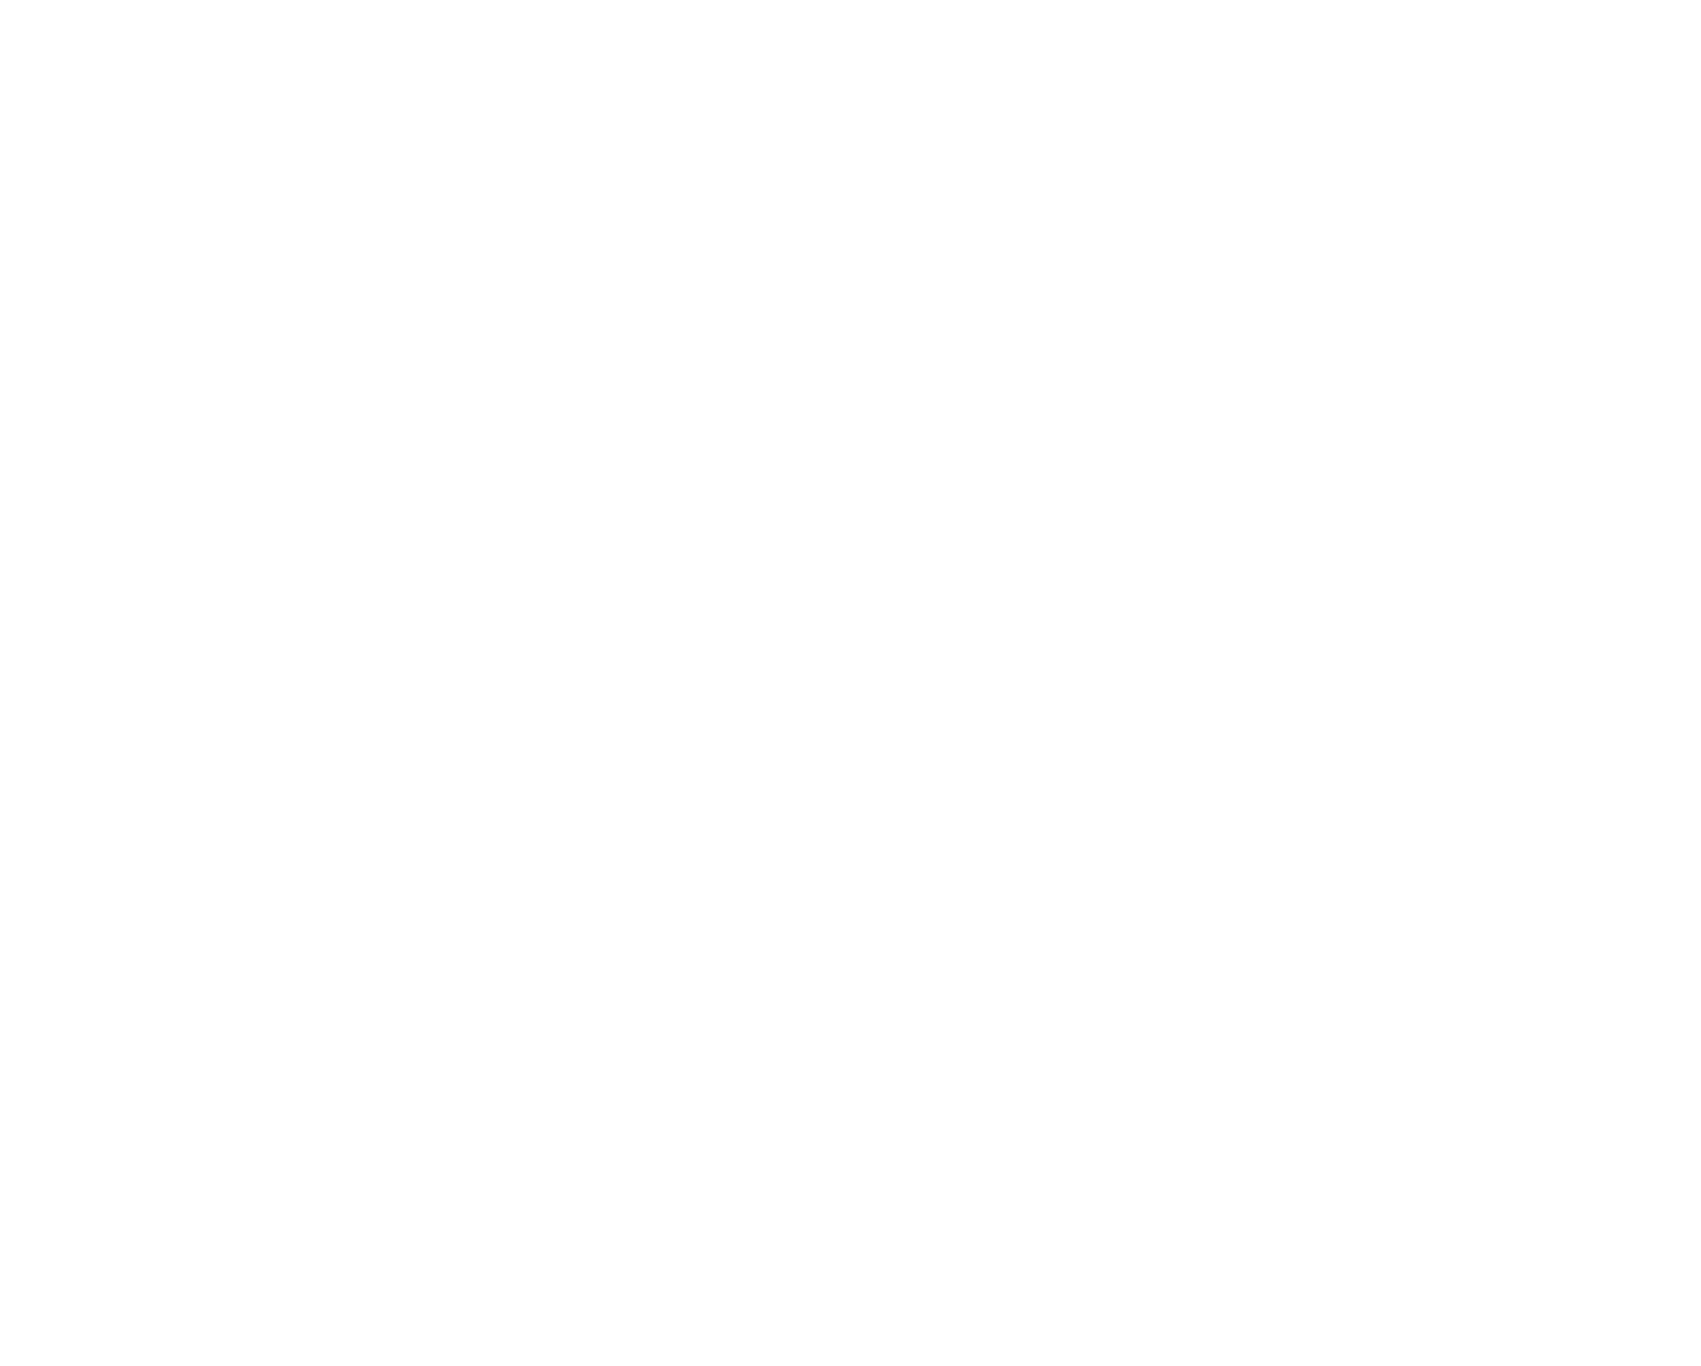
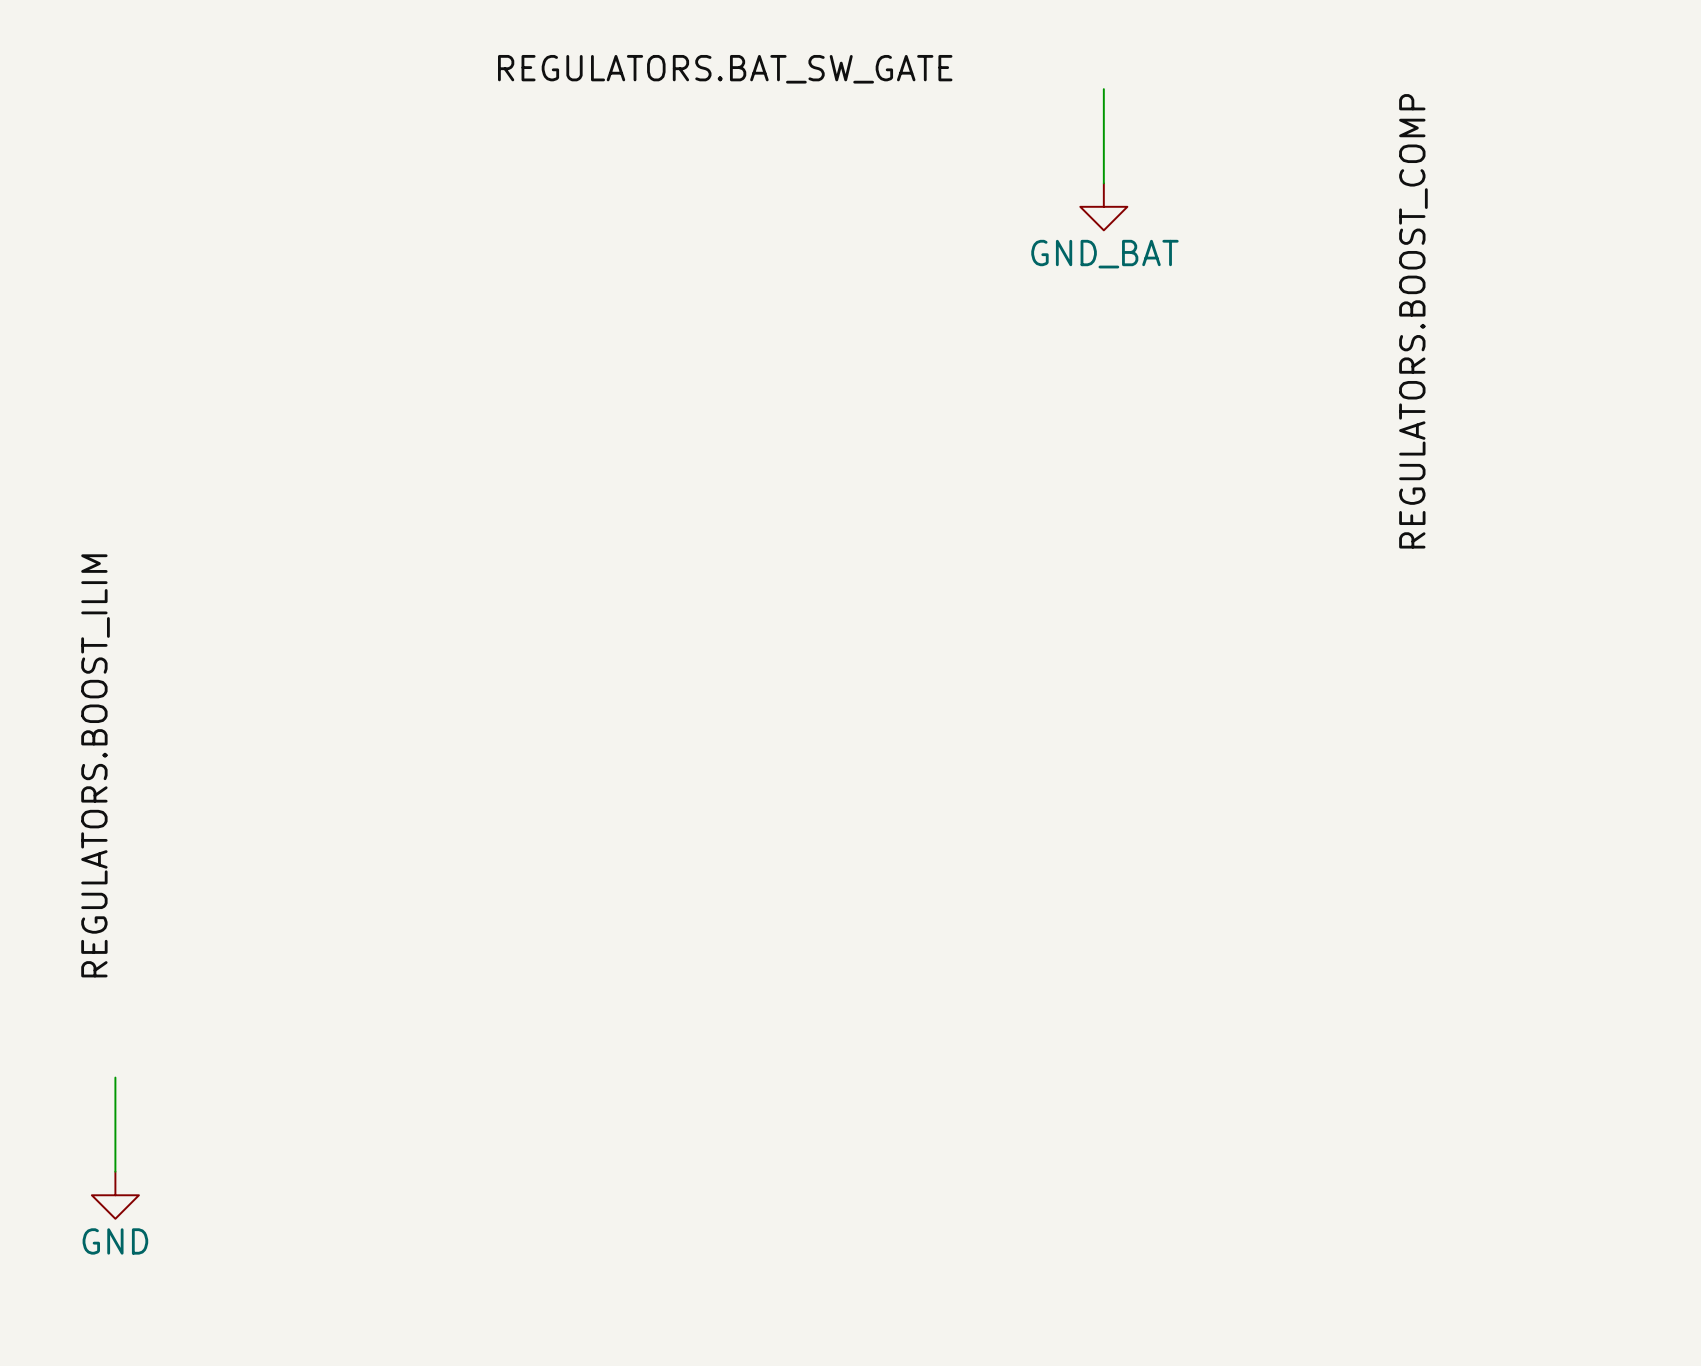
label: none -> REGULATORS.BAT_SW_GATE (725, 69)
wire: none -> (1103, 89) (1103, 183)
power symbol: none -> GND_BAT (1103, 206)
label: none -> REGULATORS.BOOST_COMP (1413, 321)
label: none -> REGULATORS.BOOST_ILIM (95, 765)
wire: none -> (115, 1077) (115, 1171)
power symbol: none -> GND (115, 1195)

